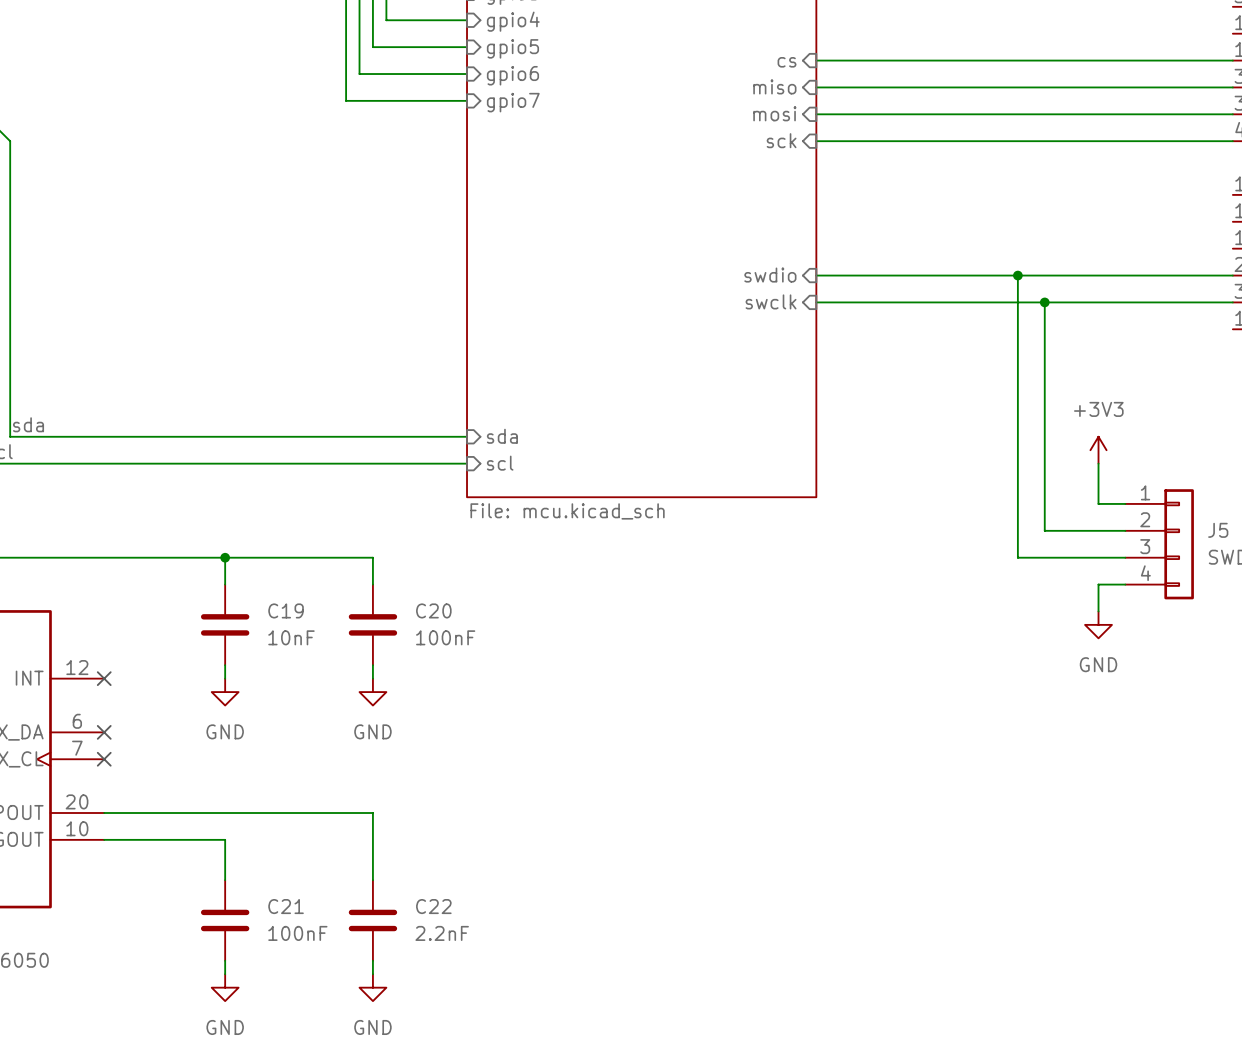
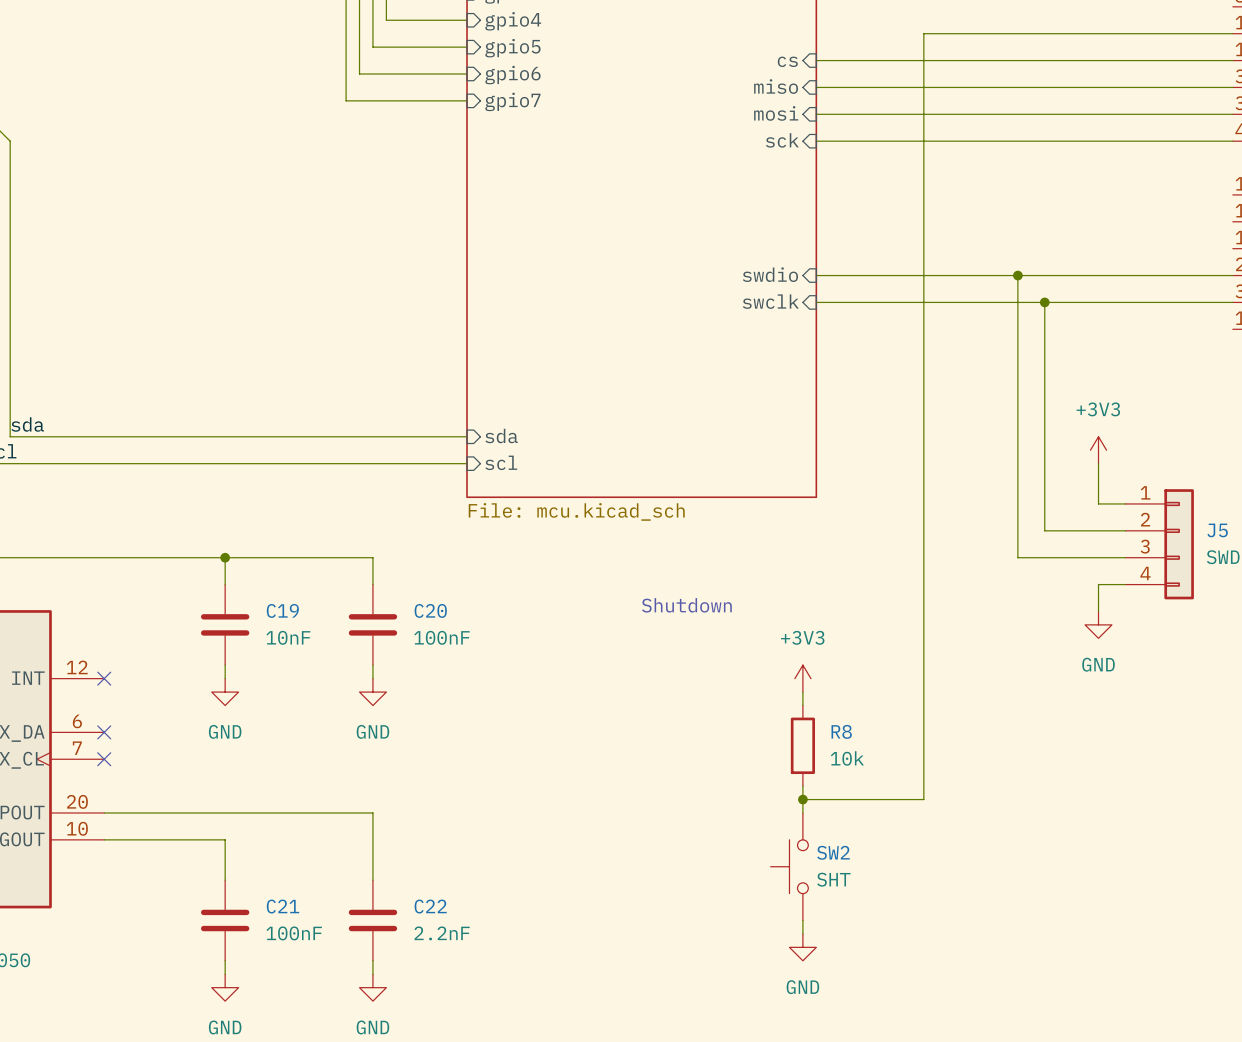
wire: none -> (1232, 33) (923, 33) (923, 799) (802, 799)
text: none -> Shutdown (686, 605)
power symbol: none -> +3V3 (802, 678)
wire: none -> (802, 692) (802, 705)
R8: none -> 10k (802, 745)
wire: none -> (802, 786) (802, 813)
junction: none -> (802, 799)
SW2: none -> SHT (789, 866)
wire: none -> (802, 920) (802, 933)
power symbol: none -> GND (802, 947)

